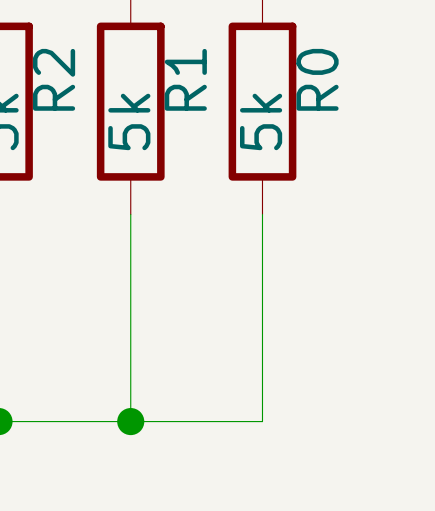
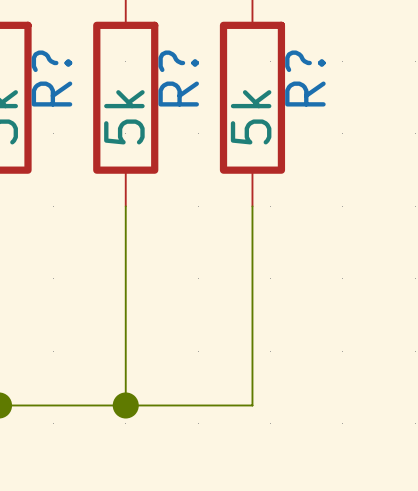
R2 name: R2 (54, 79) -> R? (51, 78)
R1 name: R1 (185, 79) -> R? (178, 78)
R0 name: R0 (317, 79) -> R? (305, 78)

